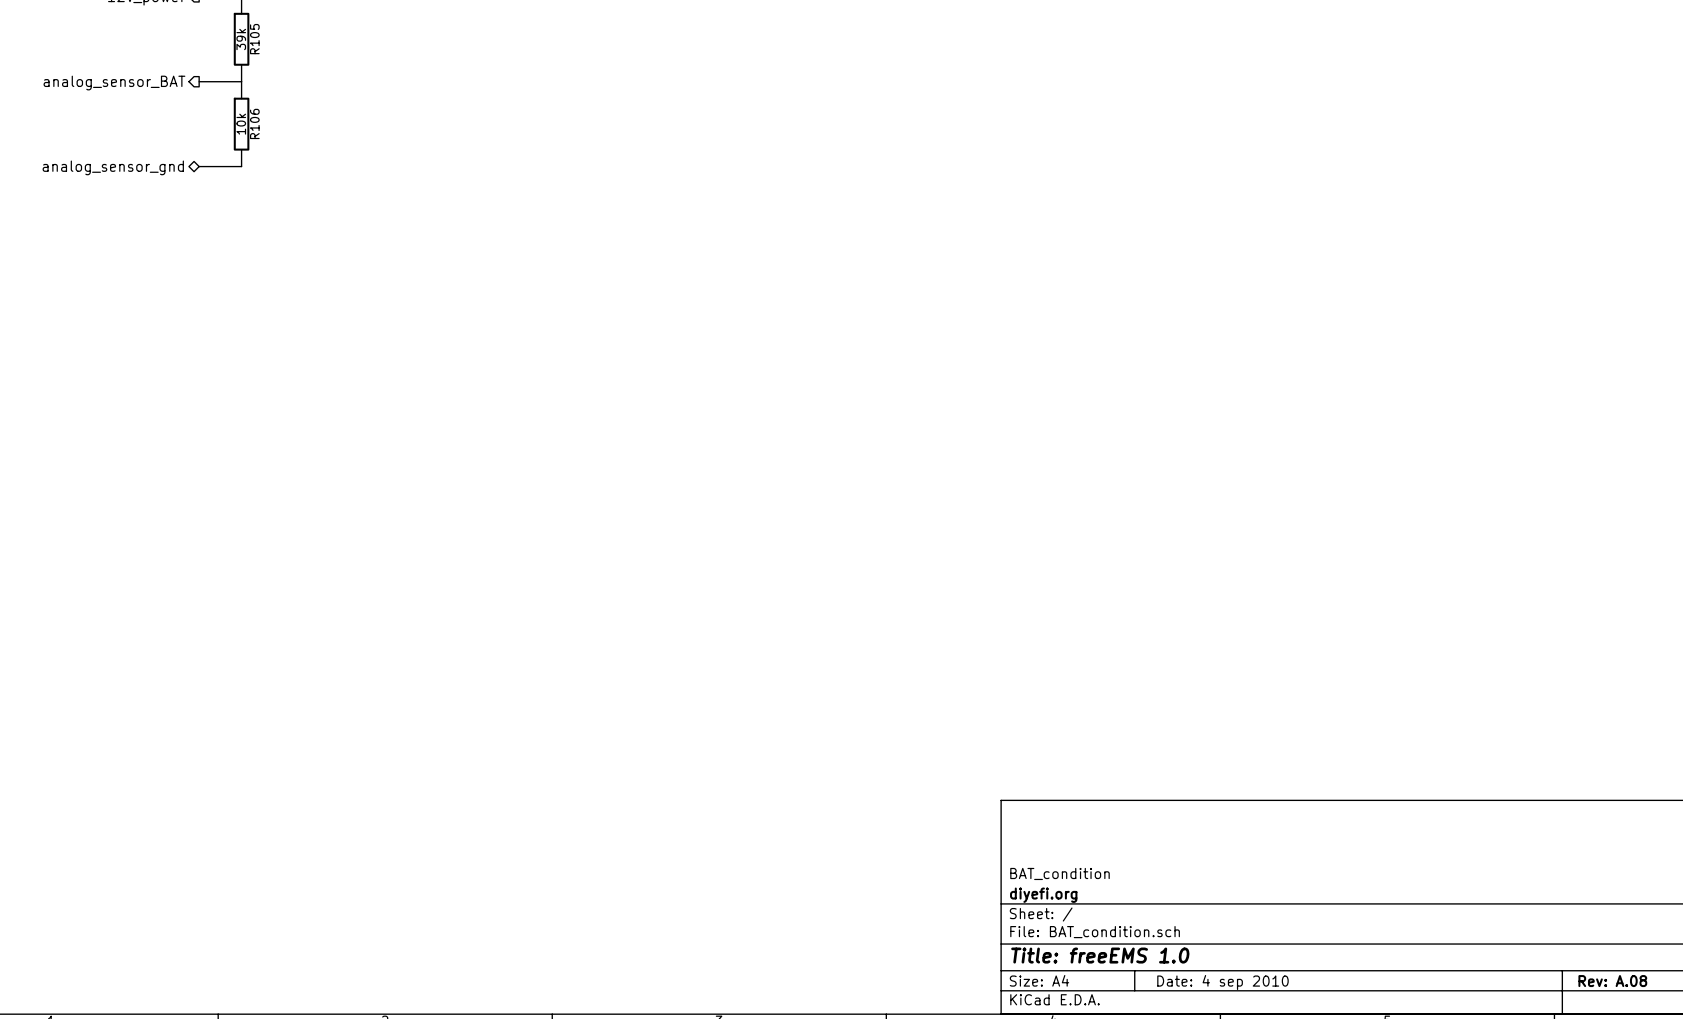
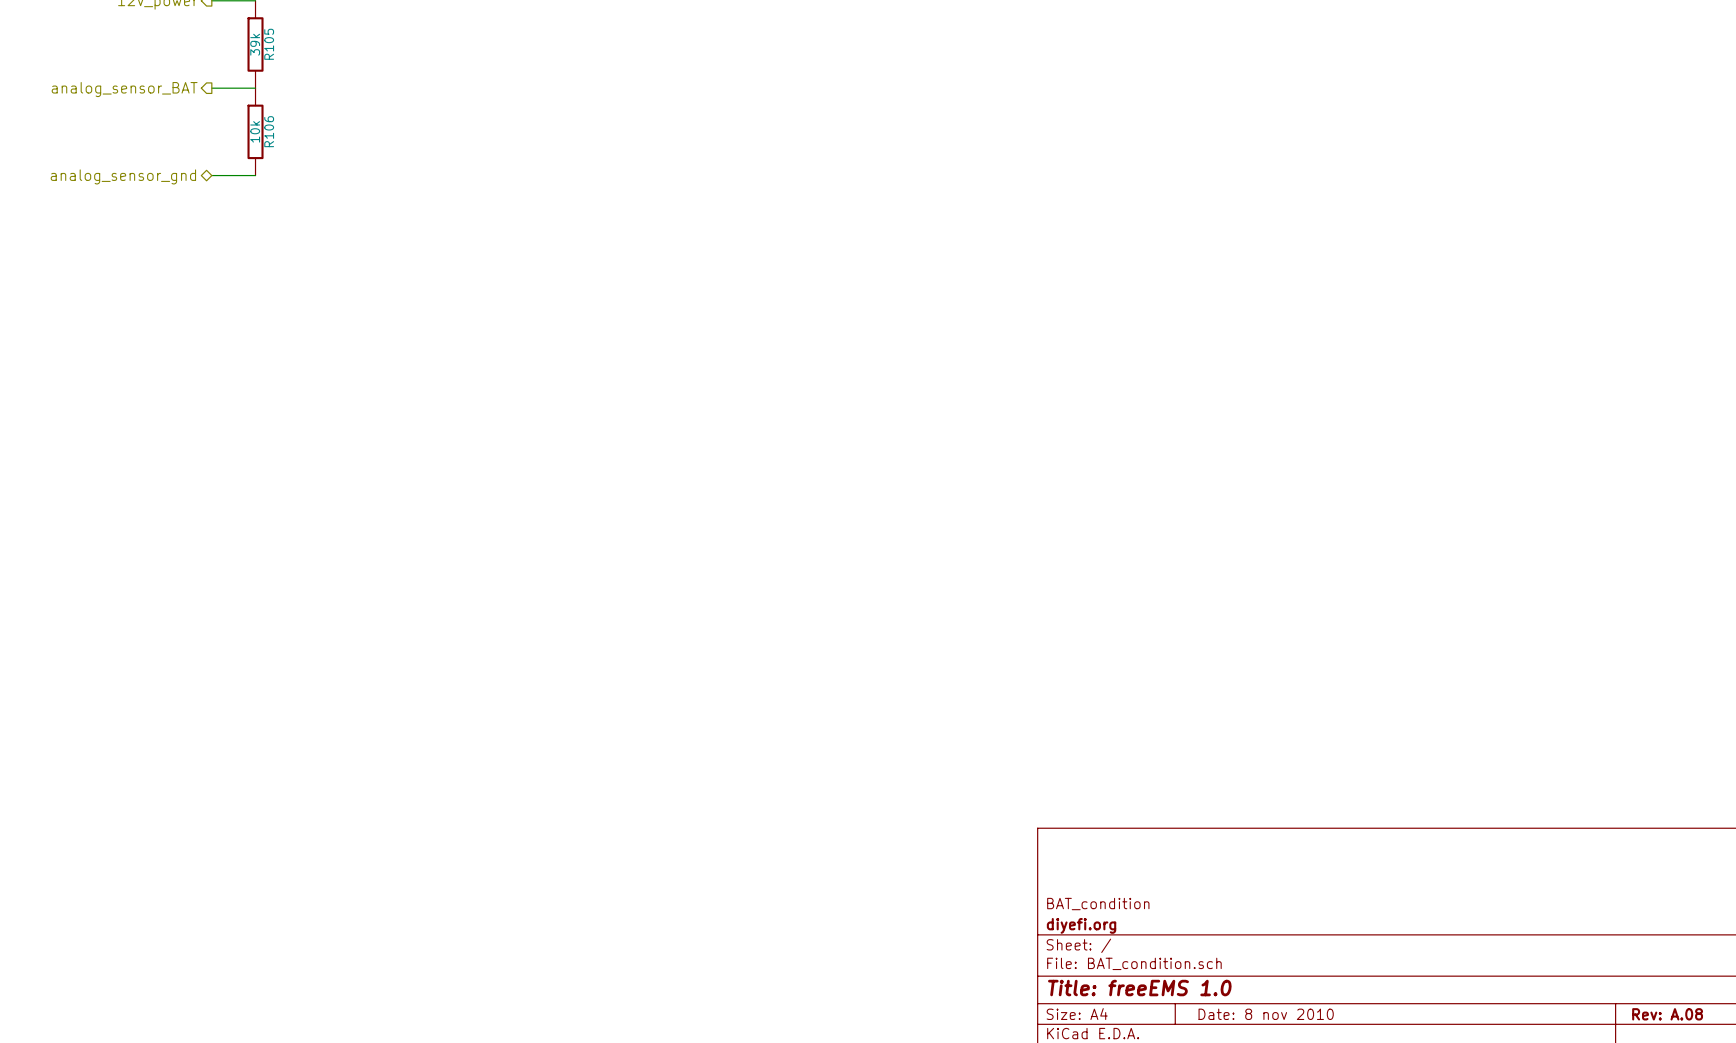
title block: Date: 4 sep 2010 (1222, 982) -> Date: 8 nov 2010 (1266, 1014)

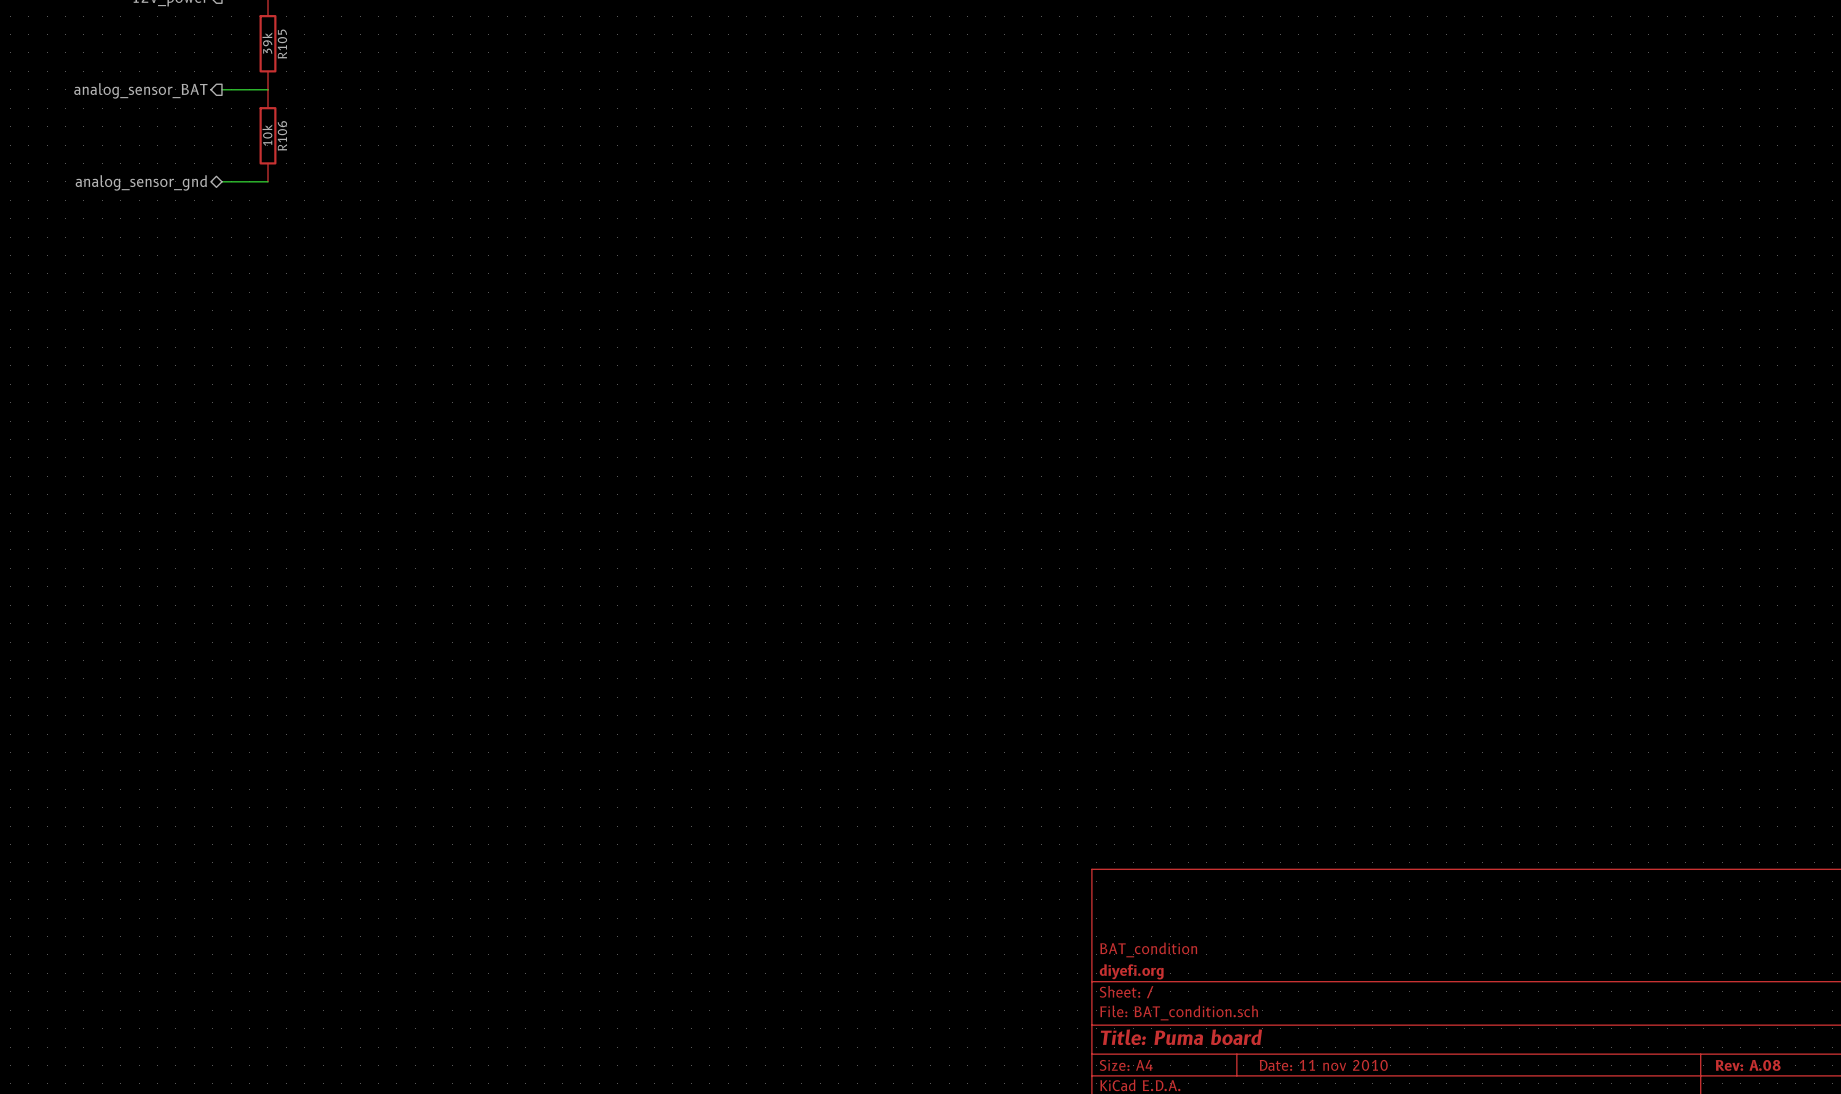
title block: Title: freeEMS 1.0 (1139, 988) -> Title: Puma board (1181, 1037)
title block: Date: 8 nov 2010 (1266, 1014) -> Date: 11 nov 2010 (1323, 1065)

